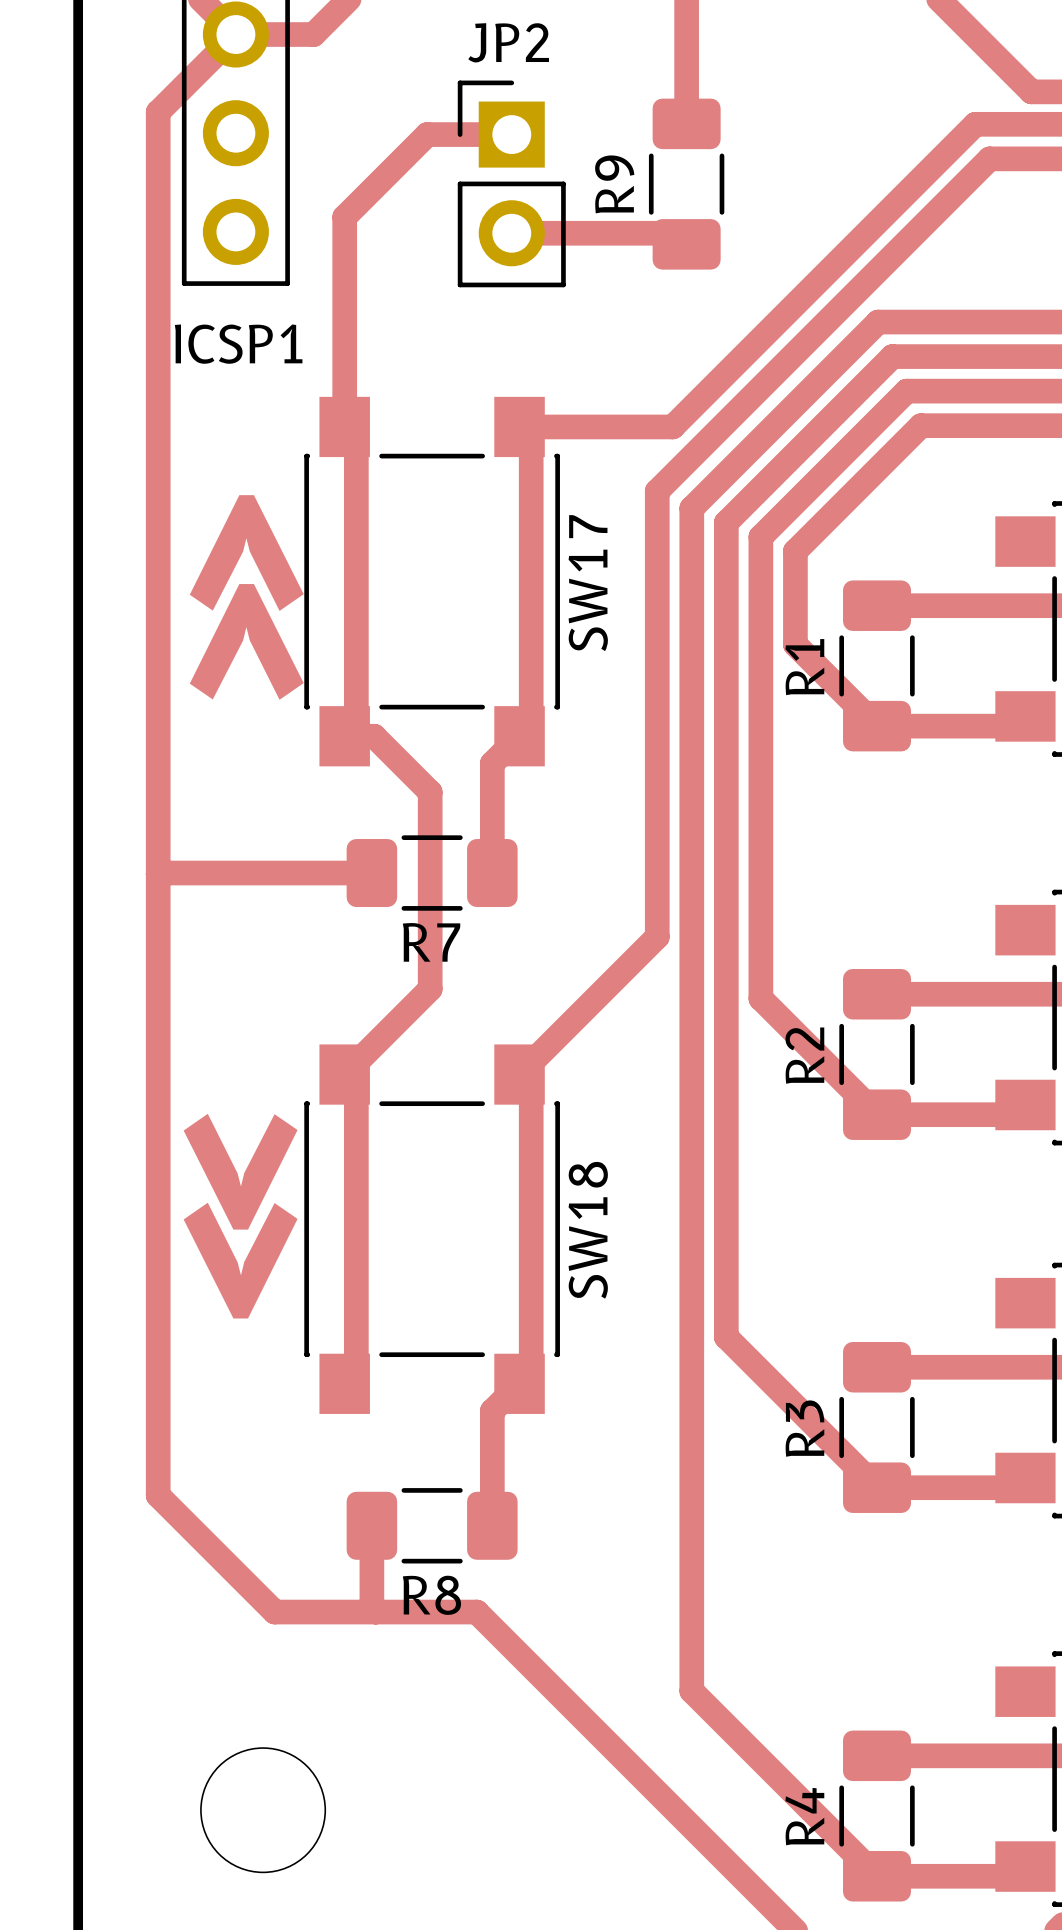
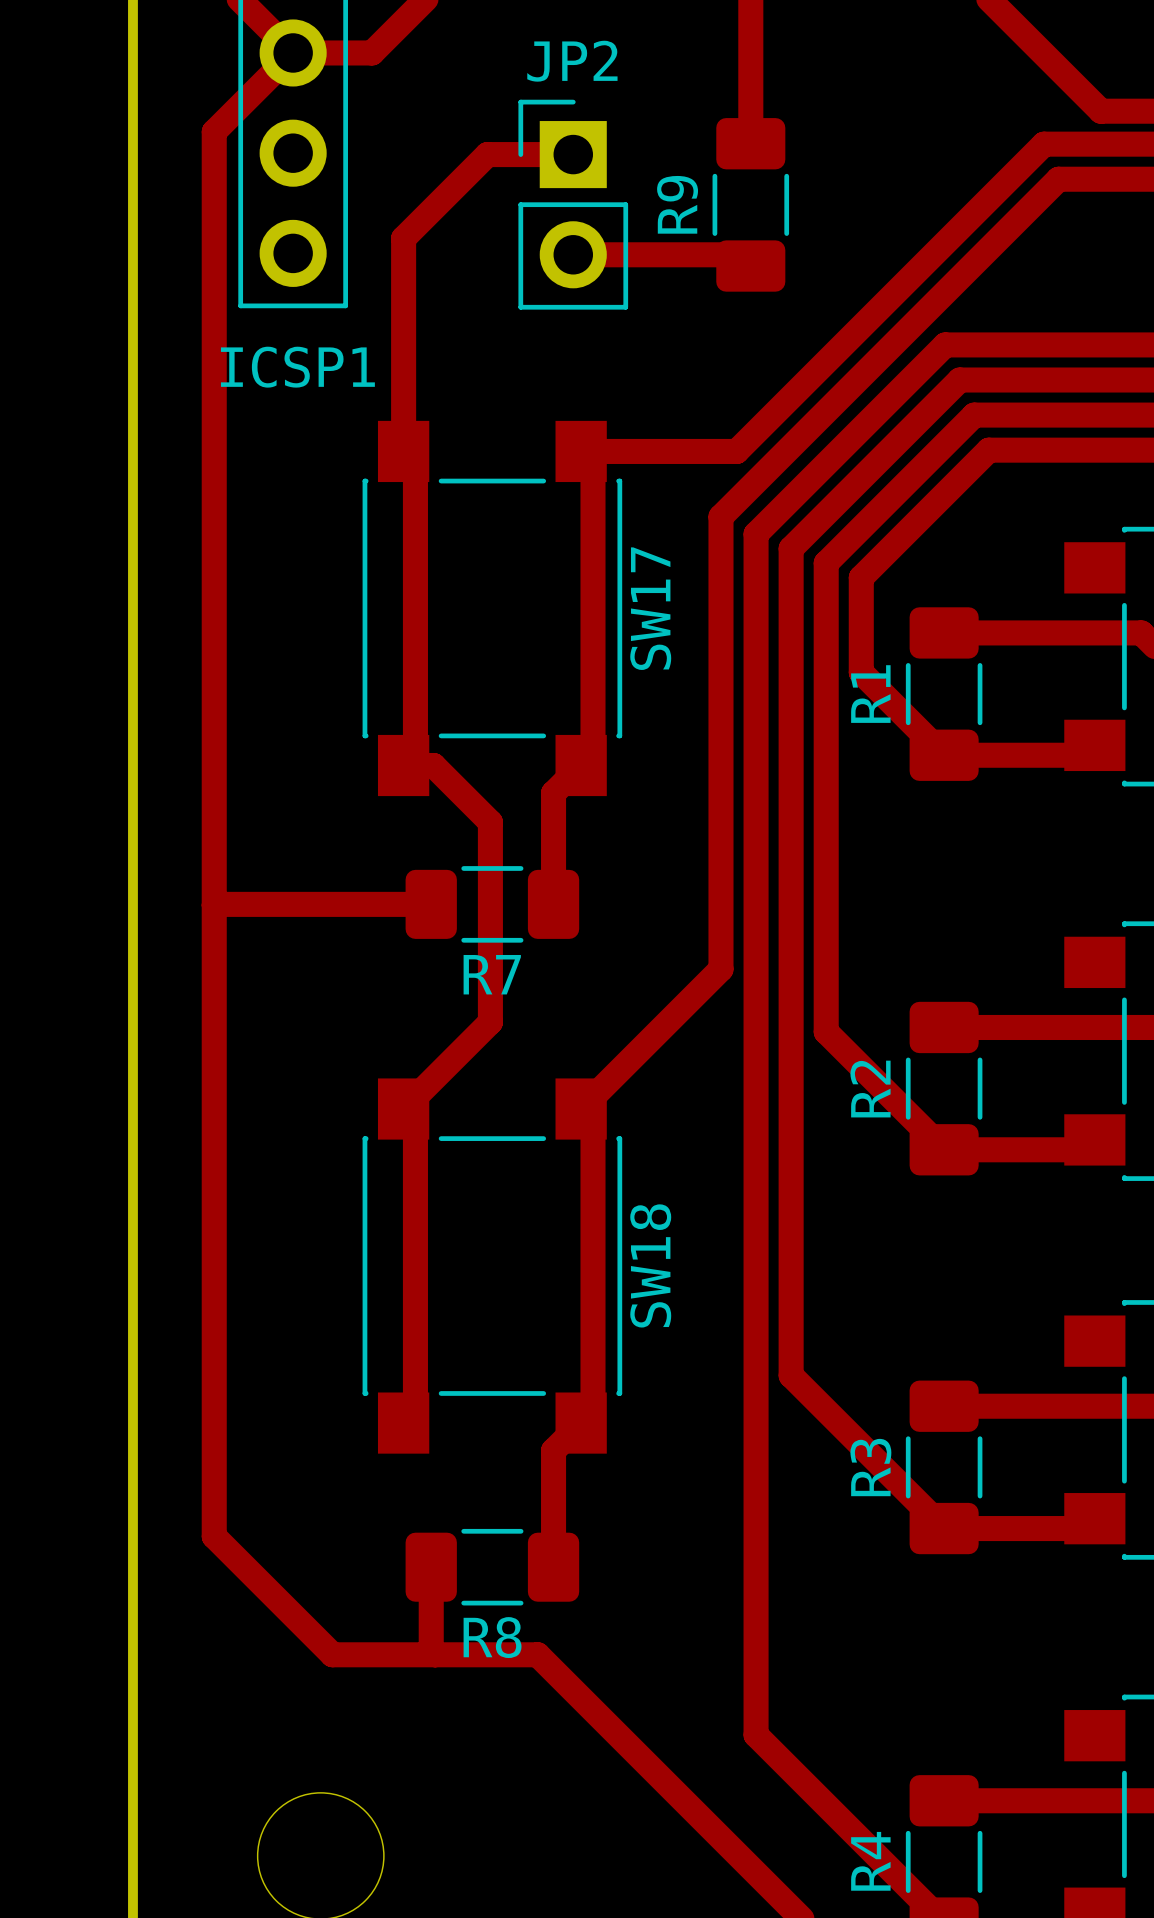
text: » (246, 597) -> none
text: » (240, 1216) -> none

